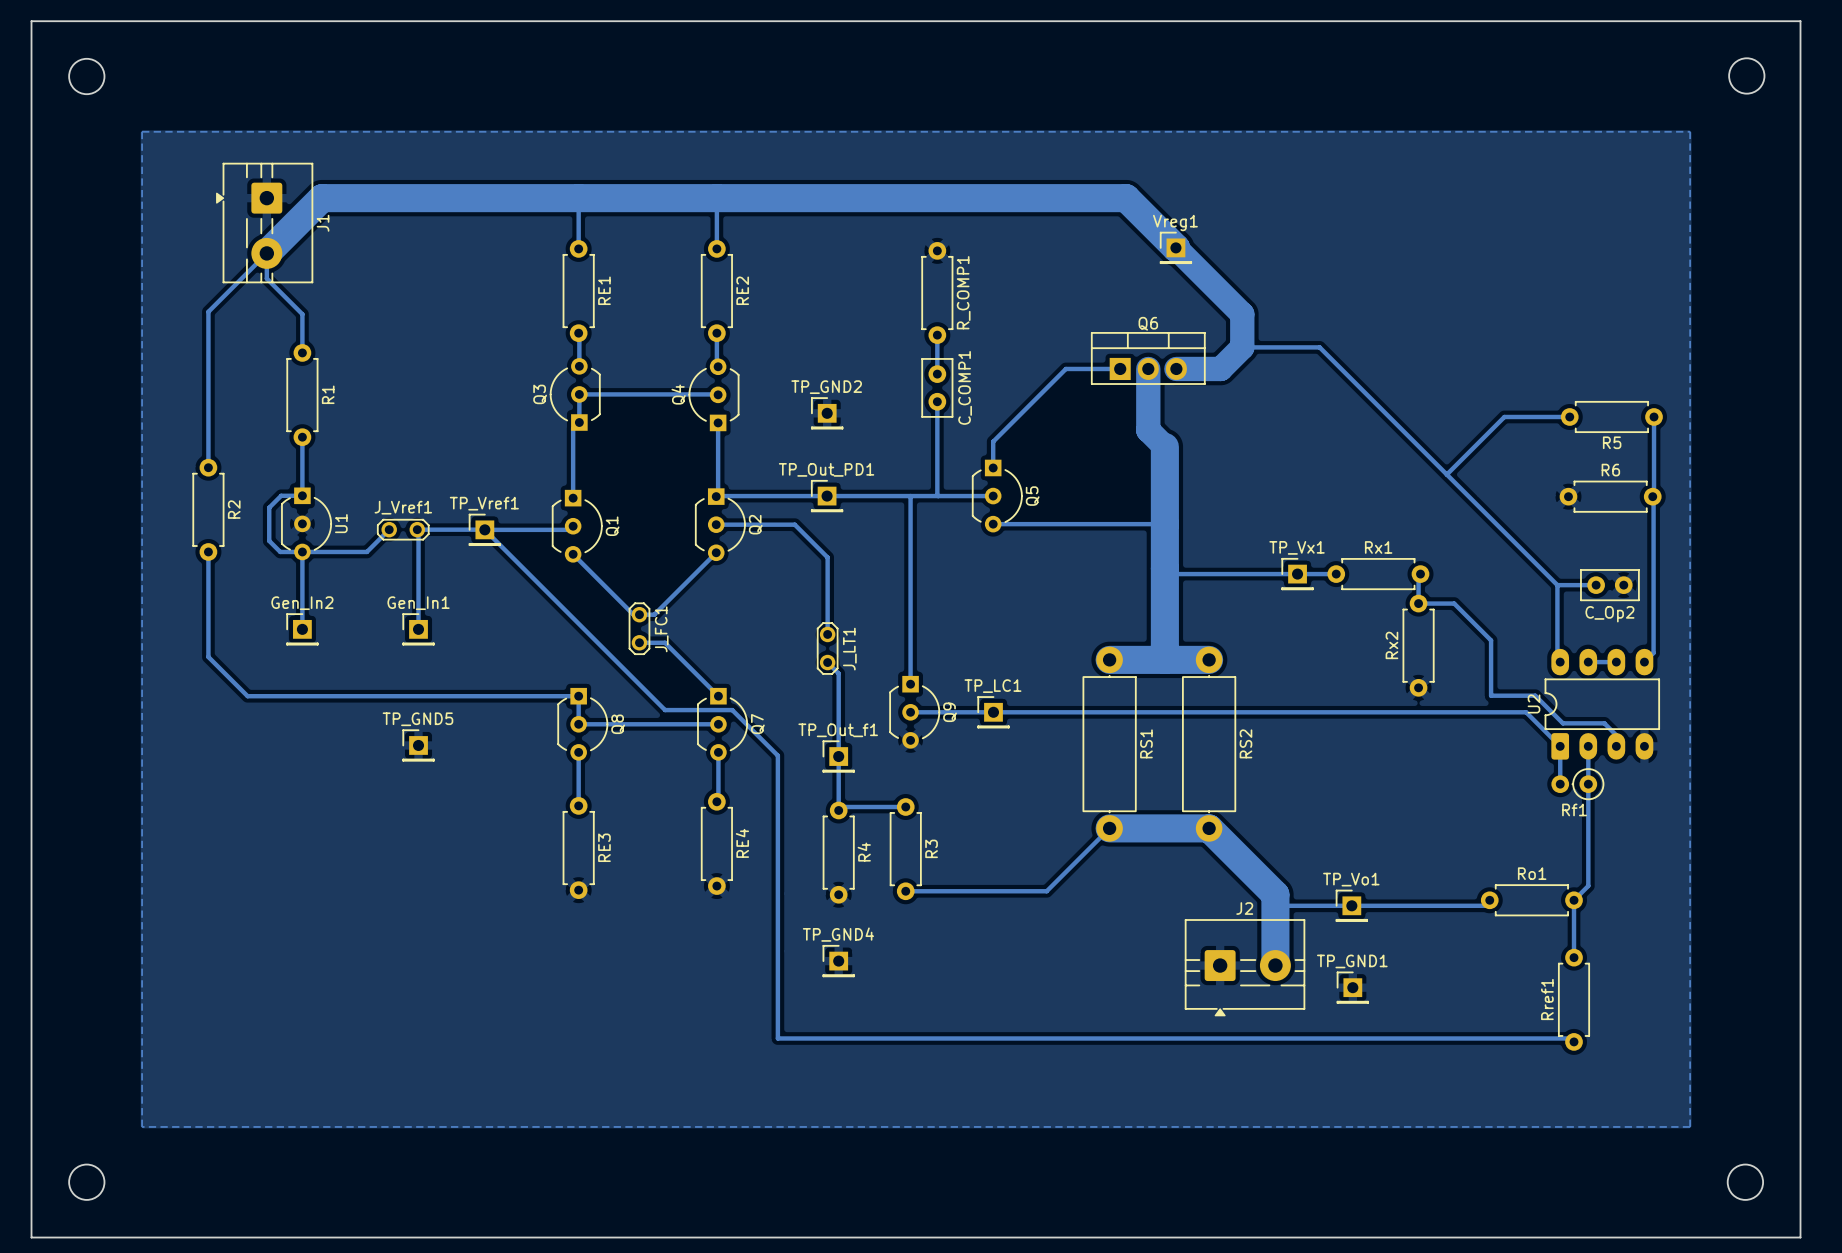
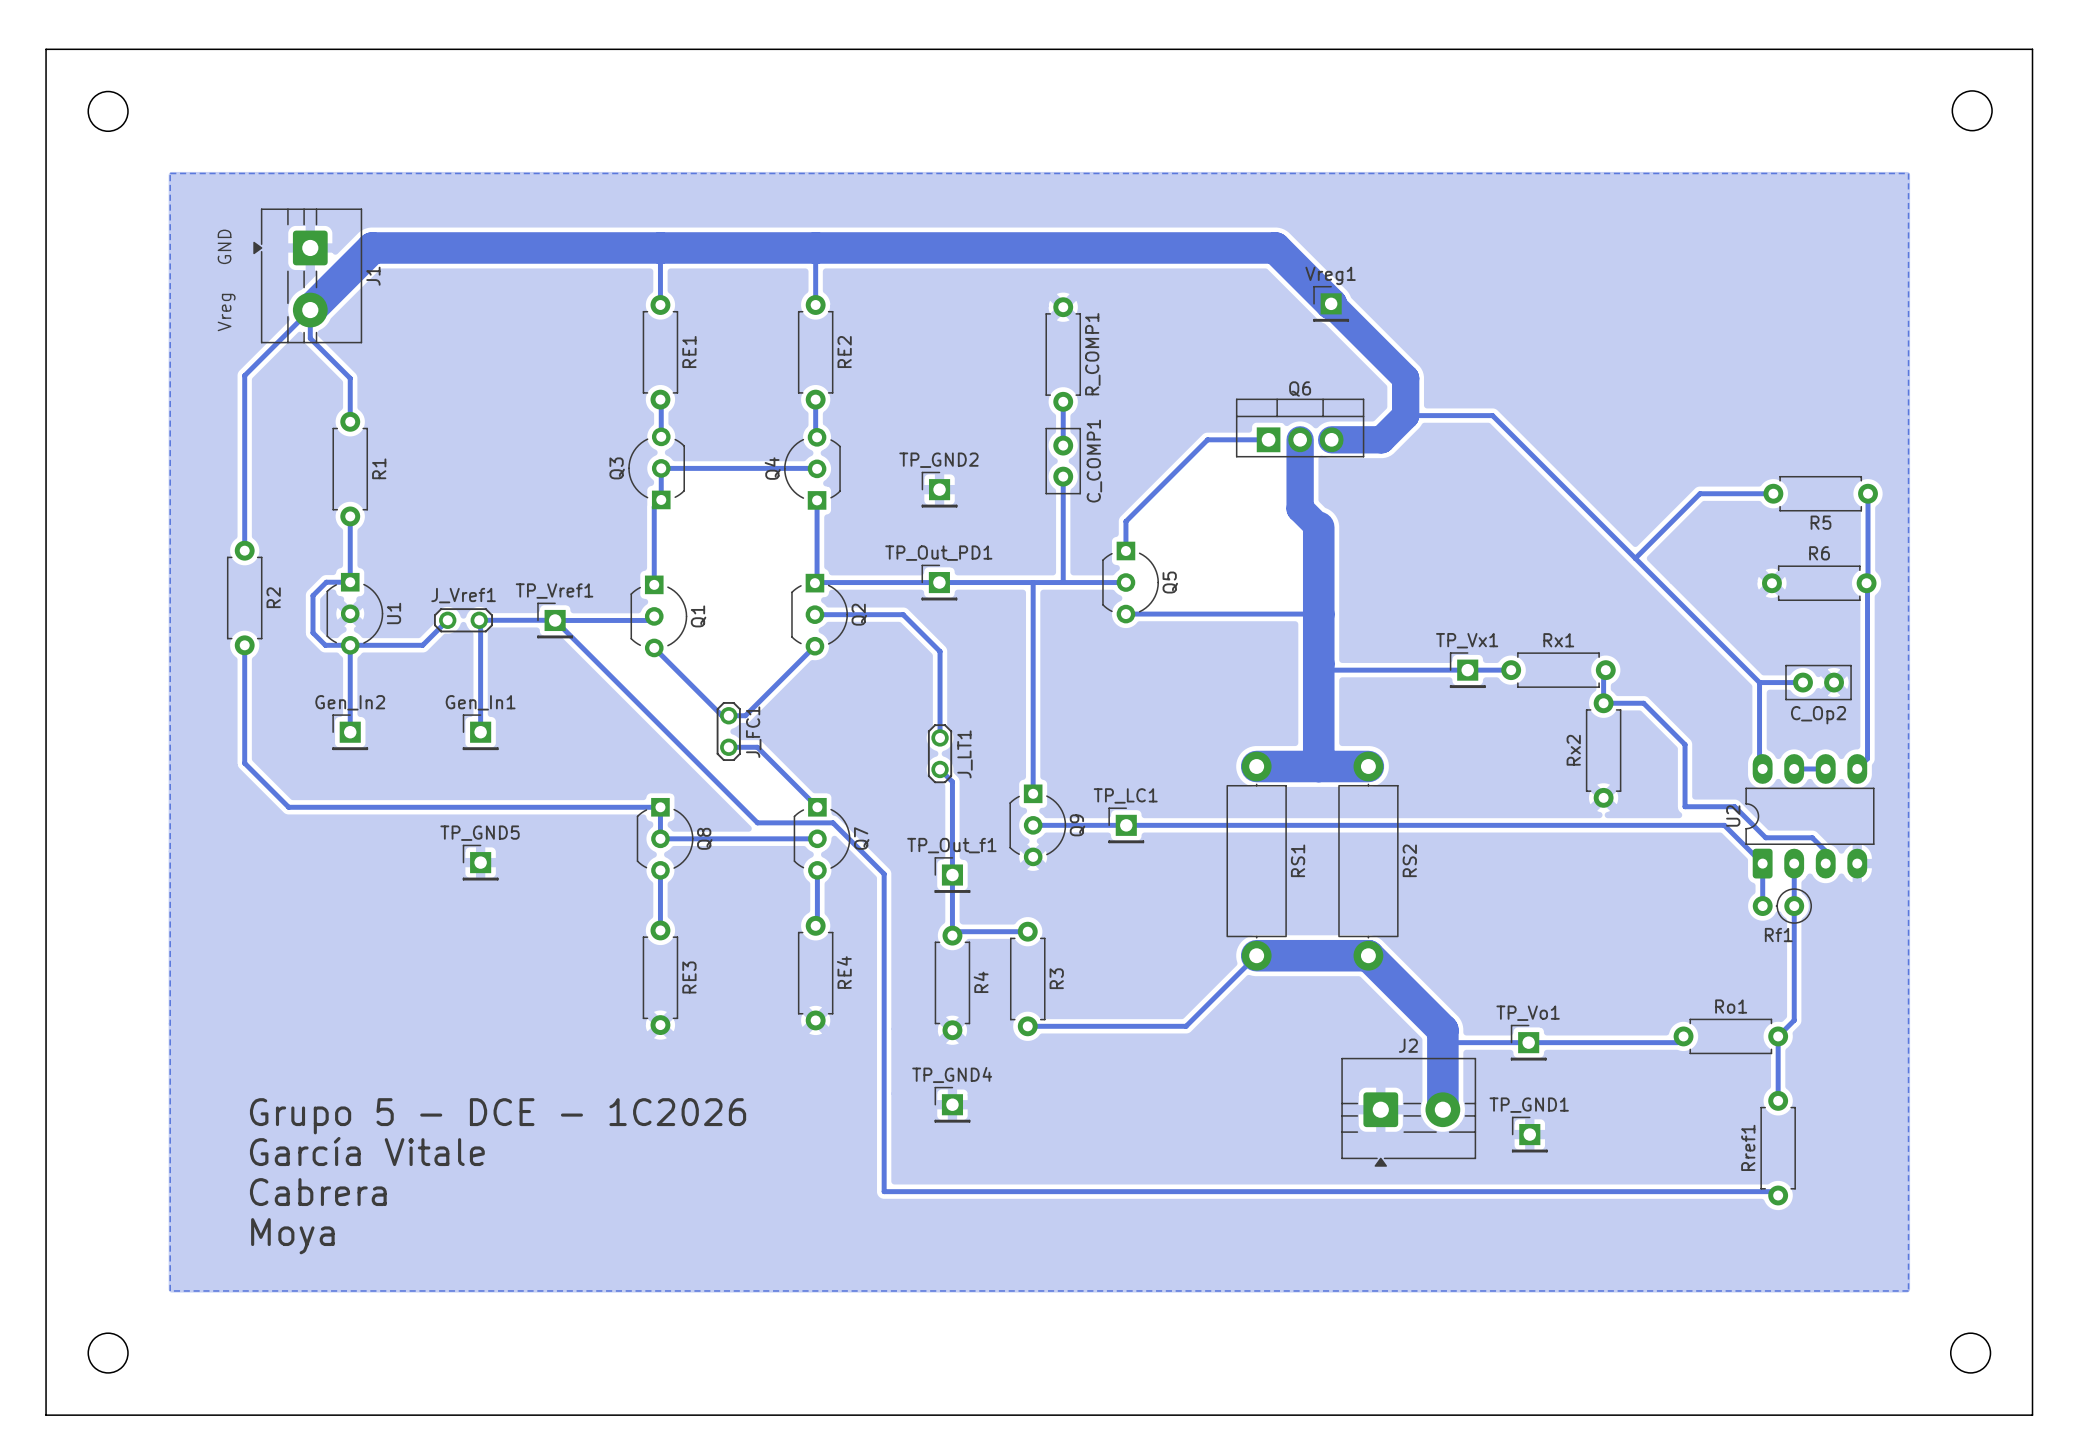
text: none -> GND (224, 246)
text: none -> Vreg (226, 312)
text: none -> Grupo 5 - DCE - 1C2026 (498, 1116)
text: none -> García Vitale (367, 1151)
text: none -> Cabrera (318, 1192)
text: none -> Moya (292, 1236)

